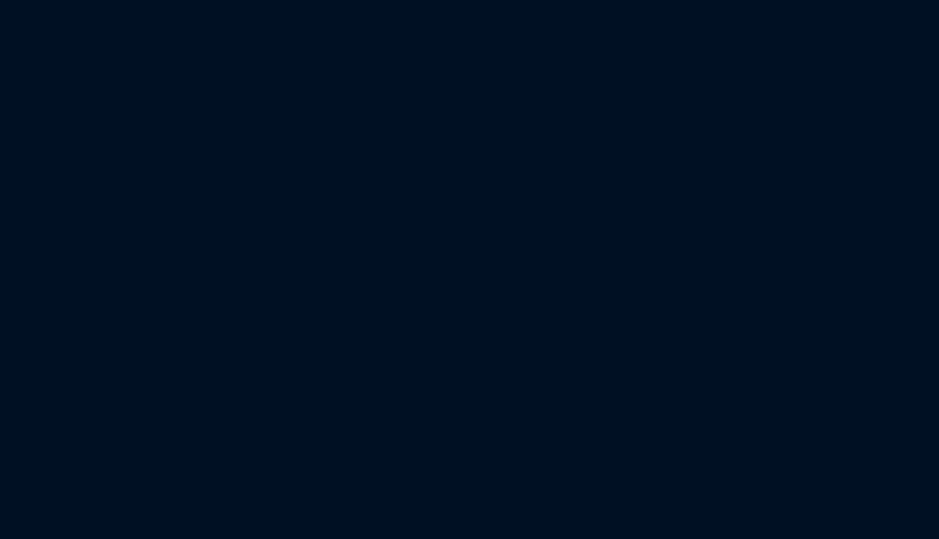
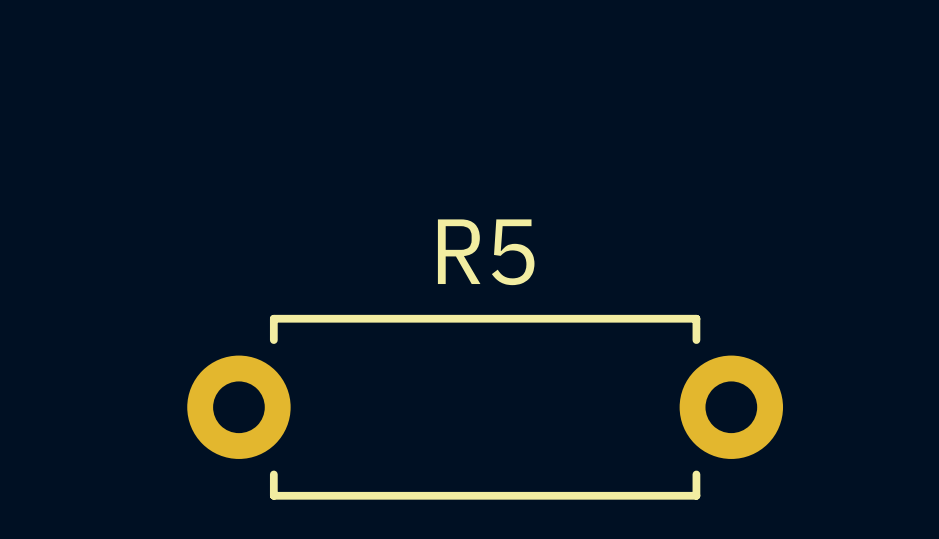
R5: none -> (485, 407)

